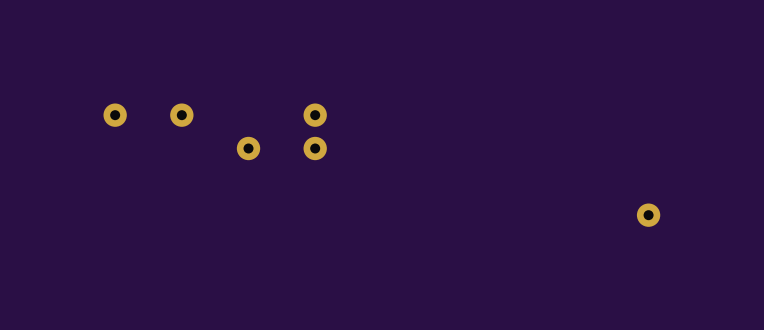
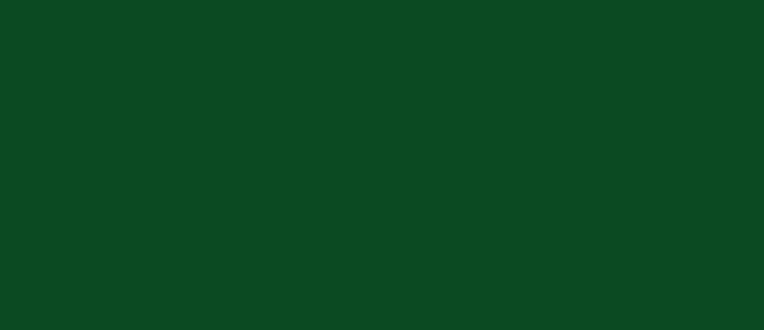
via: (115, 115) -> none
via: (181, 115) -> none
via: (315, 115) -> none
via: (248, 148) -> none
via: (315, 148) -> none
via: (648, 215) -> none

